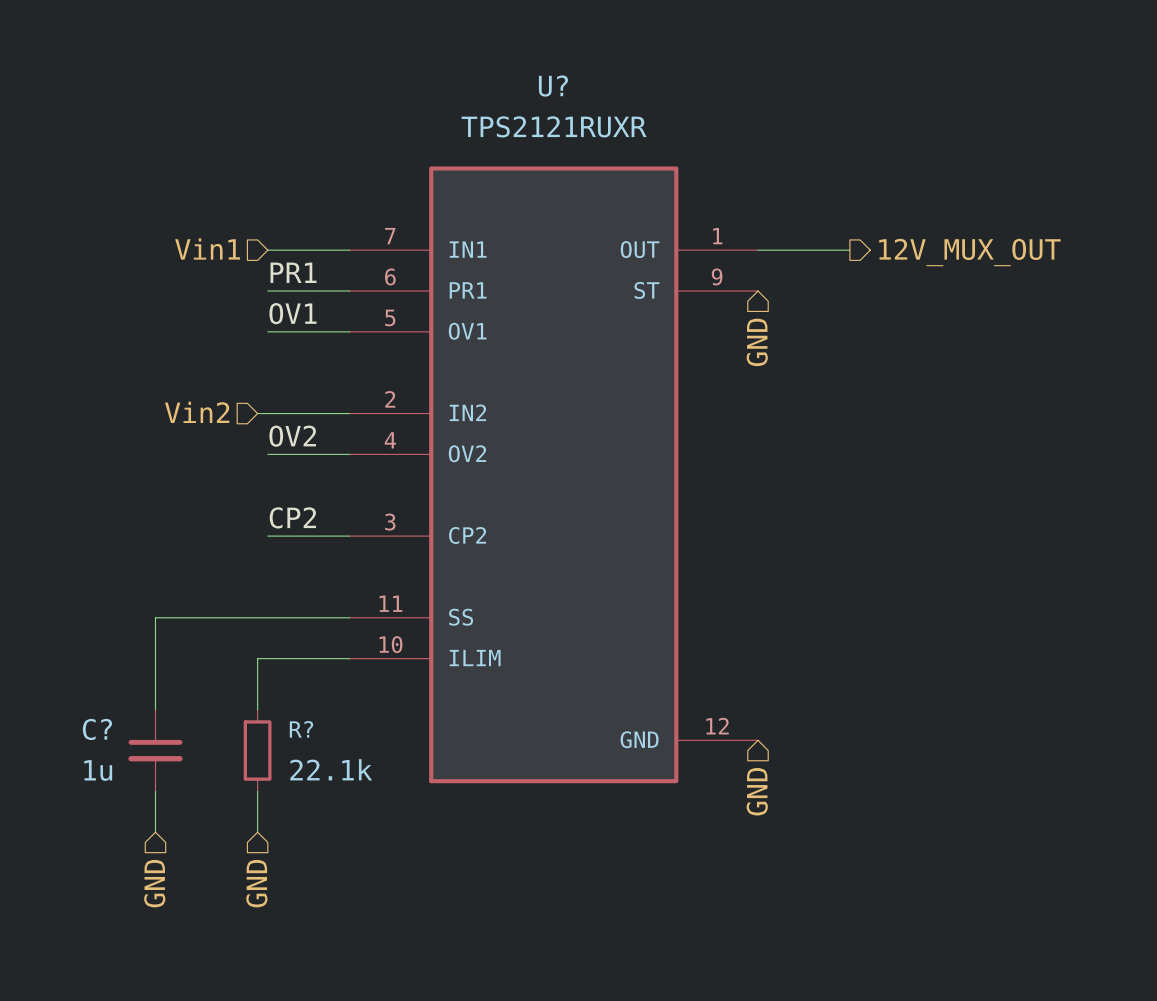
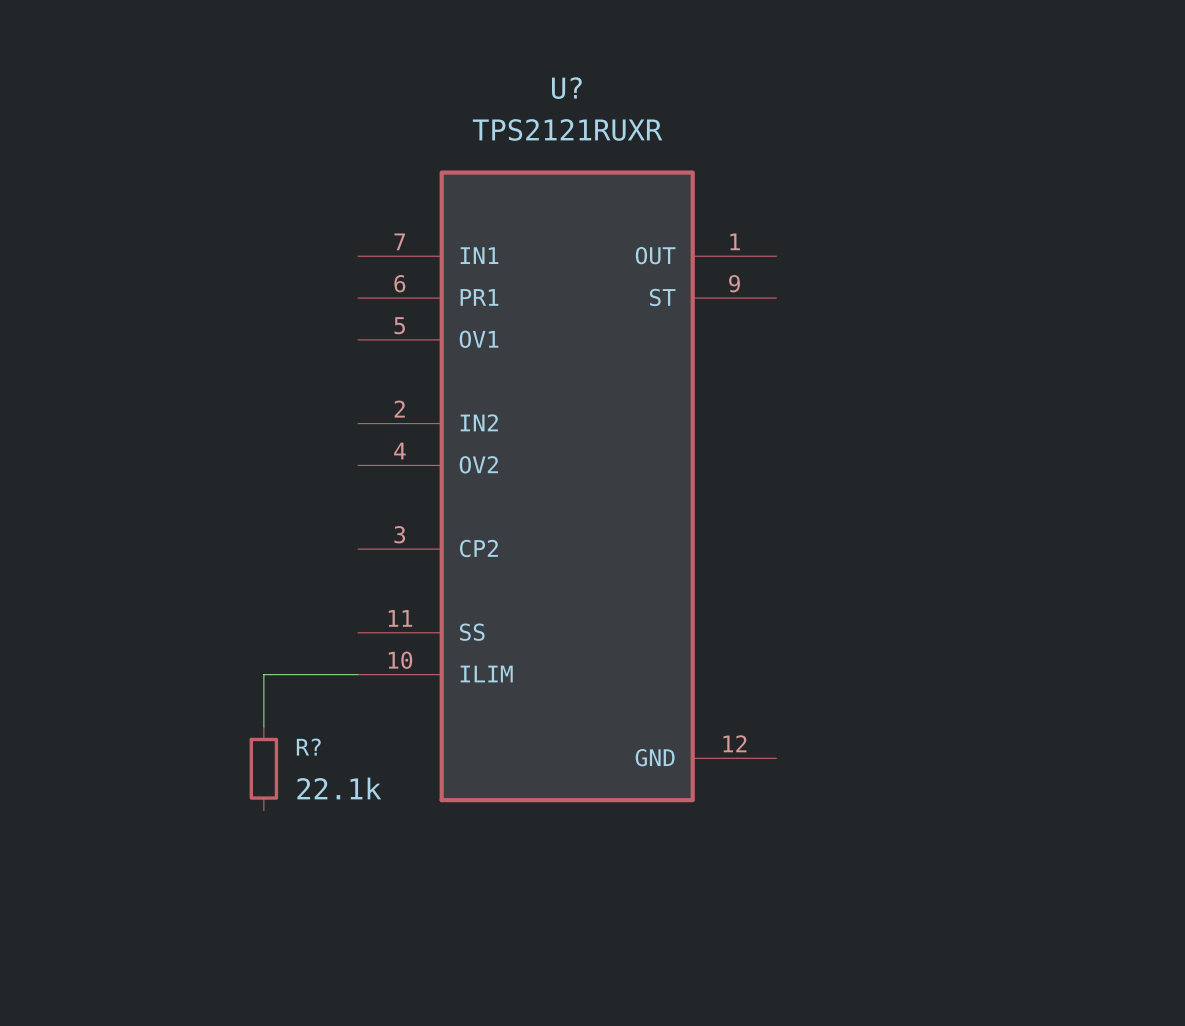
hierarchical label: Vin1 (207, 248) -> none
wire: (267, 250) (349, 250) -> none
wire: (757, 250) (849, 250) -> none
hierarchical label: 12V_MUX_OUT (969, 252) -> none
label: PR1 (293, 272) -> none
wire: (267, 291) (349, 291) -> none
label: OV1 (292, 313) -> none
wire: (267, 331) (349, 331) -> none
hierarchical label: GND (757, 342) -> none
hierarchical label: Vin2 (197, 412) -> none
wire: (257, 413) (349, 413) -> none
label: OV2 (292, 436) -> none
wire: (267, 454) (349, 454) -> none
label: CP2 (292, 517) -> none
wire: (267, 536) (349, 536) -> none
wire: (349, 617) (155, 617) (155, 709) -> none
C?: 1u (155, 750) -> none
wire: (155, 791) (155, 832) -> none
wire: (257, 791) (257, 832) -> none
hierarchical label: GND (757, 791) -> none
hierarchical label: GND (154, 883) -> none
hierarchical label: GND (256, 883) -> none

